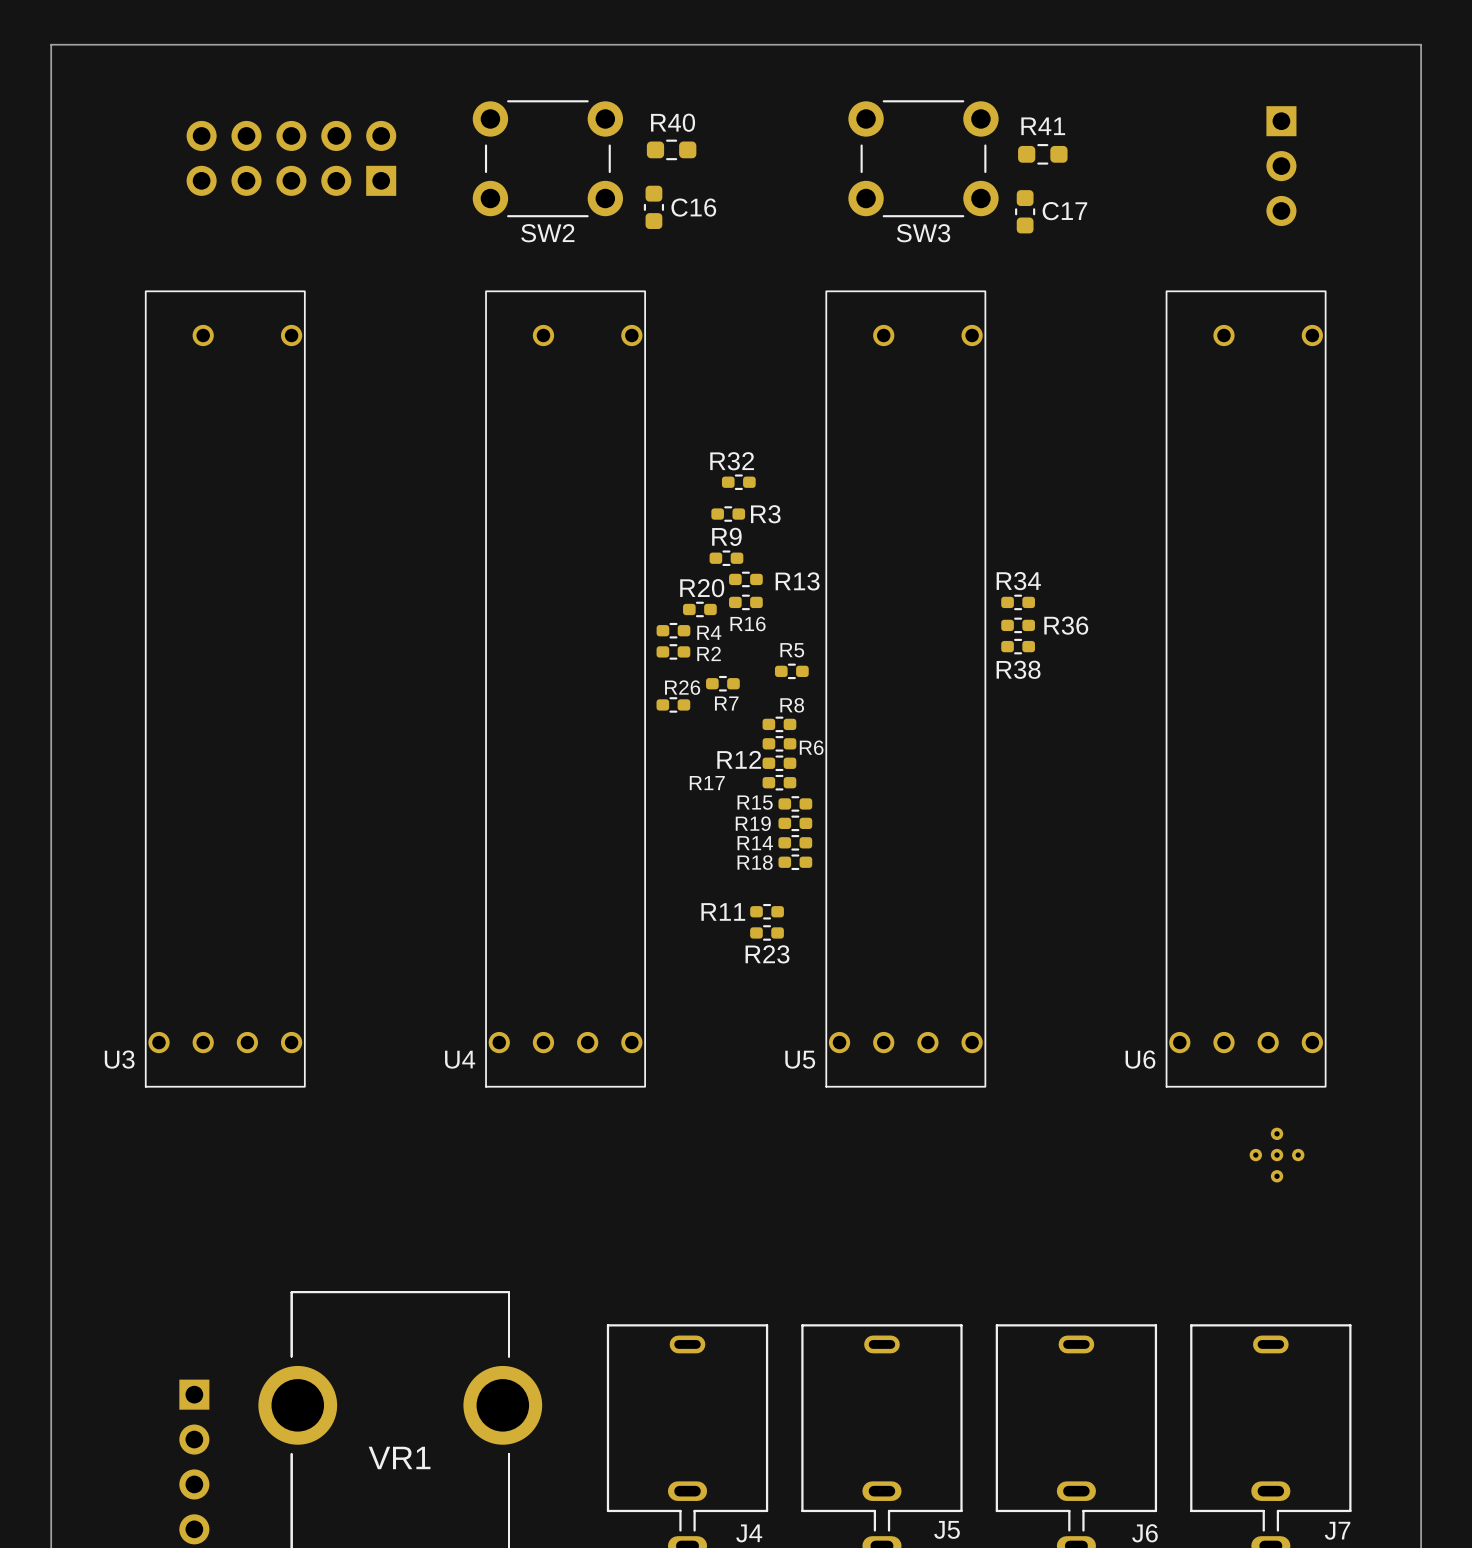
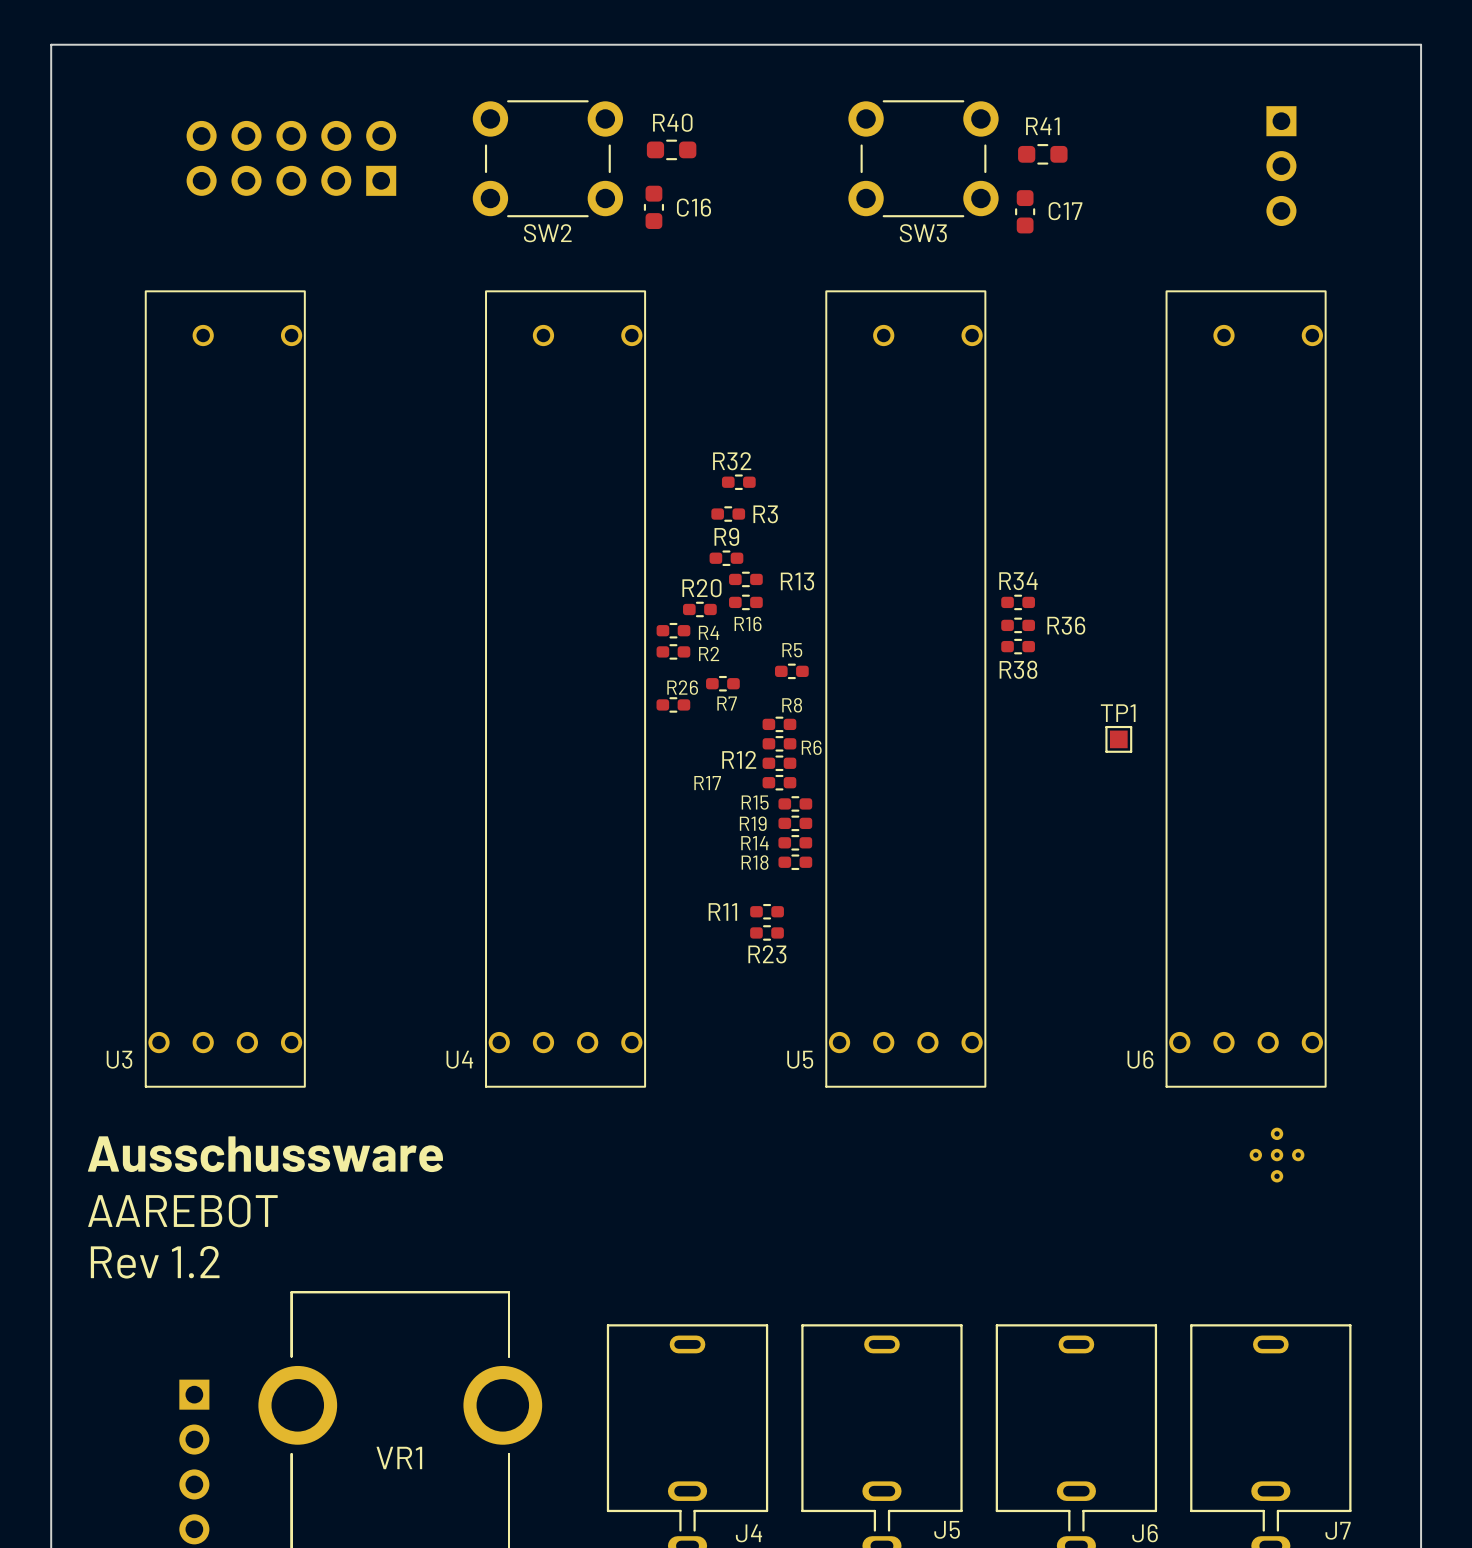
TP1: none -> (1118, 739)
text: none -> Ausschussware (265, 1154)
text: none -> AAREBOT (182, 1211)
text: none -> Rev 1.2 (155, 1262)

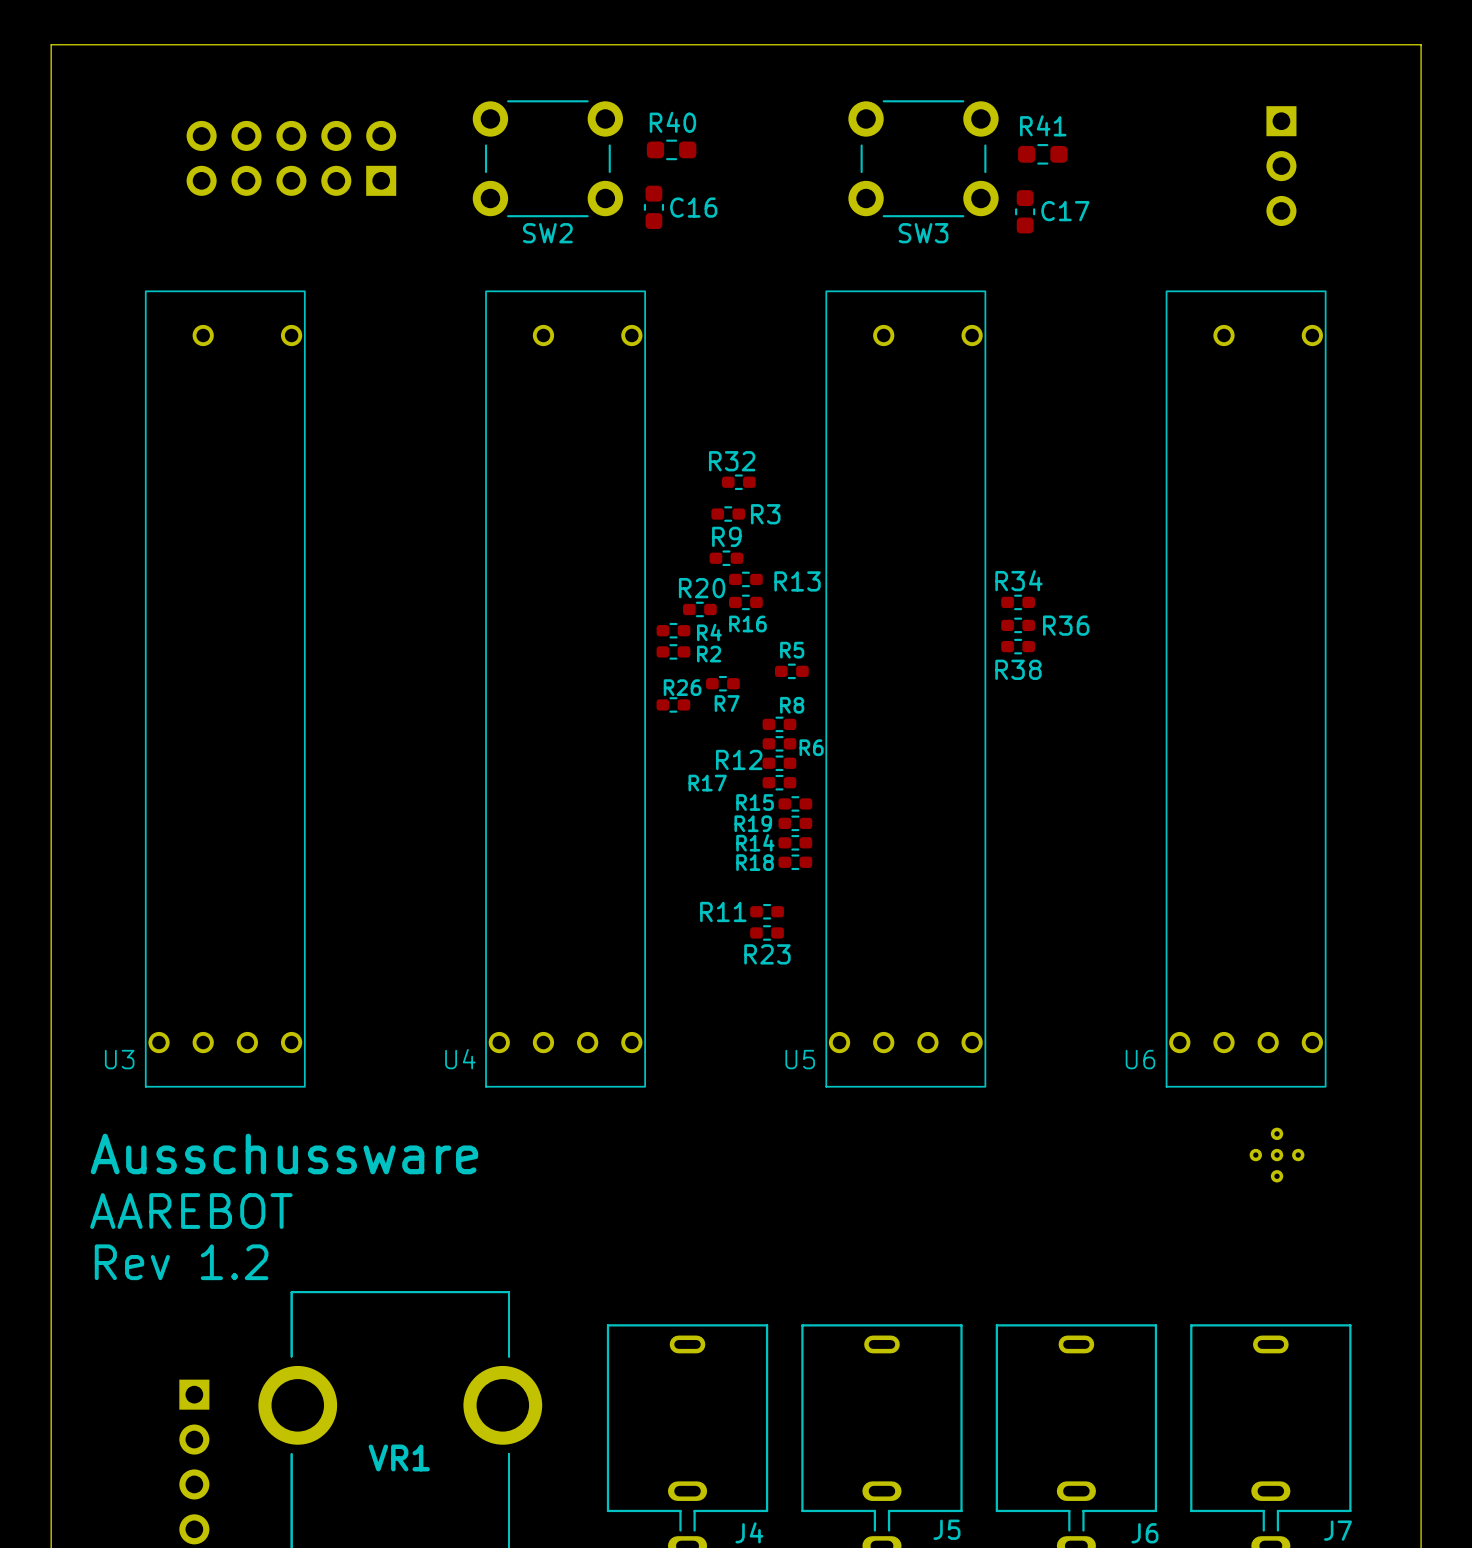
TP1: (1118, 739) -> none

